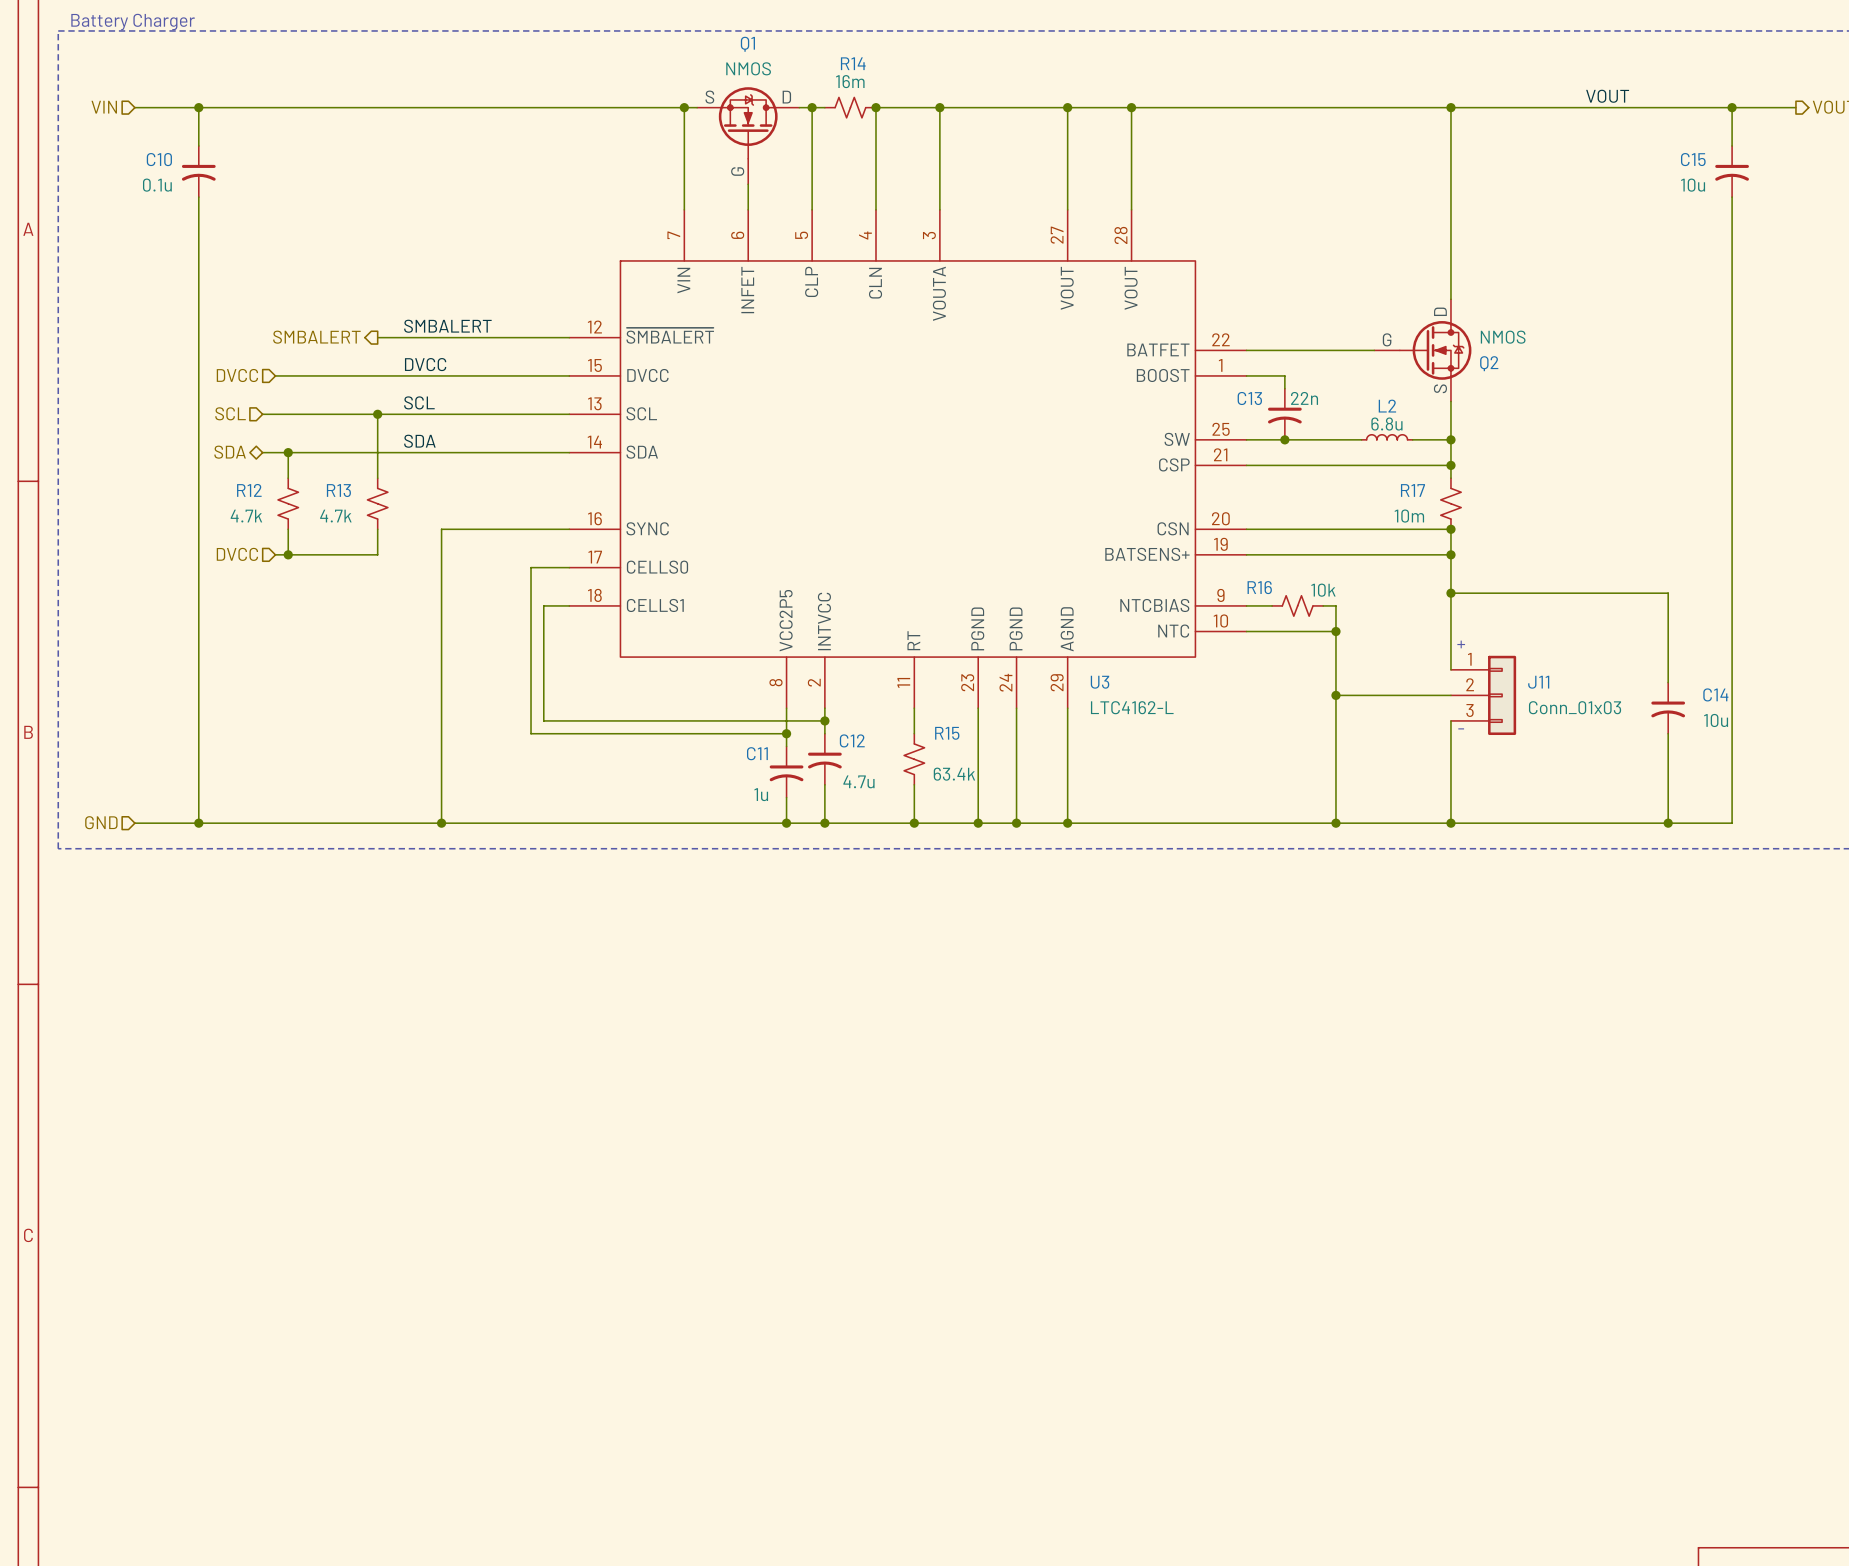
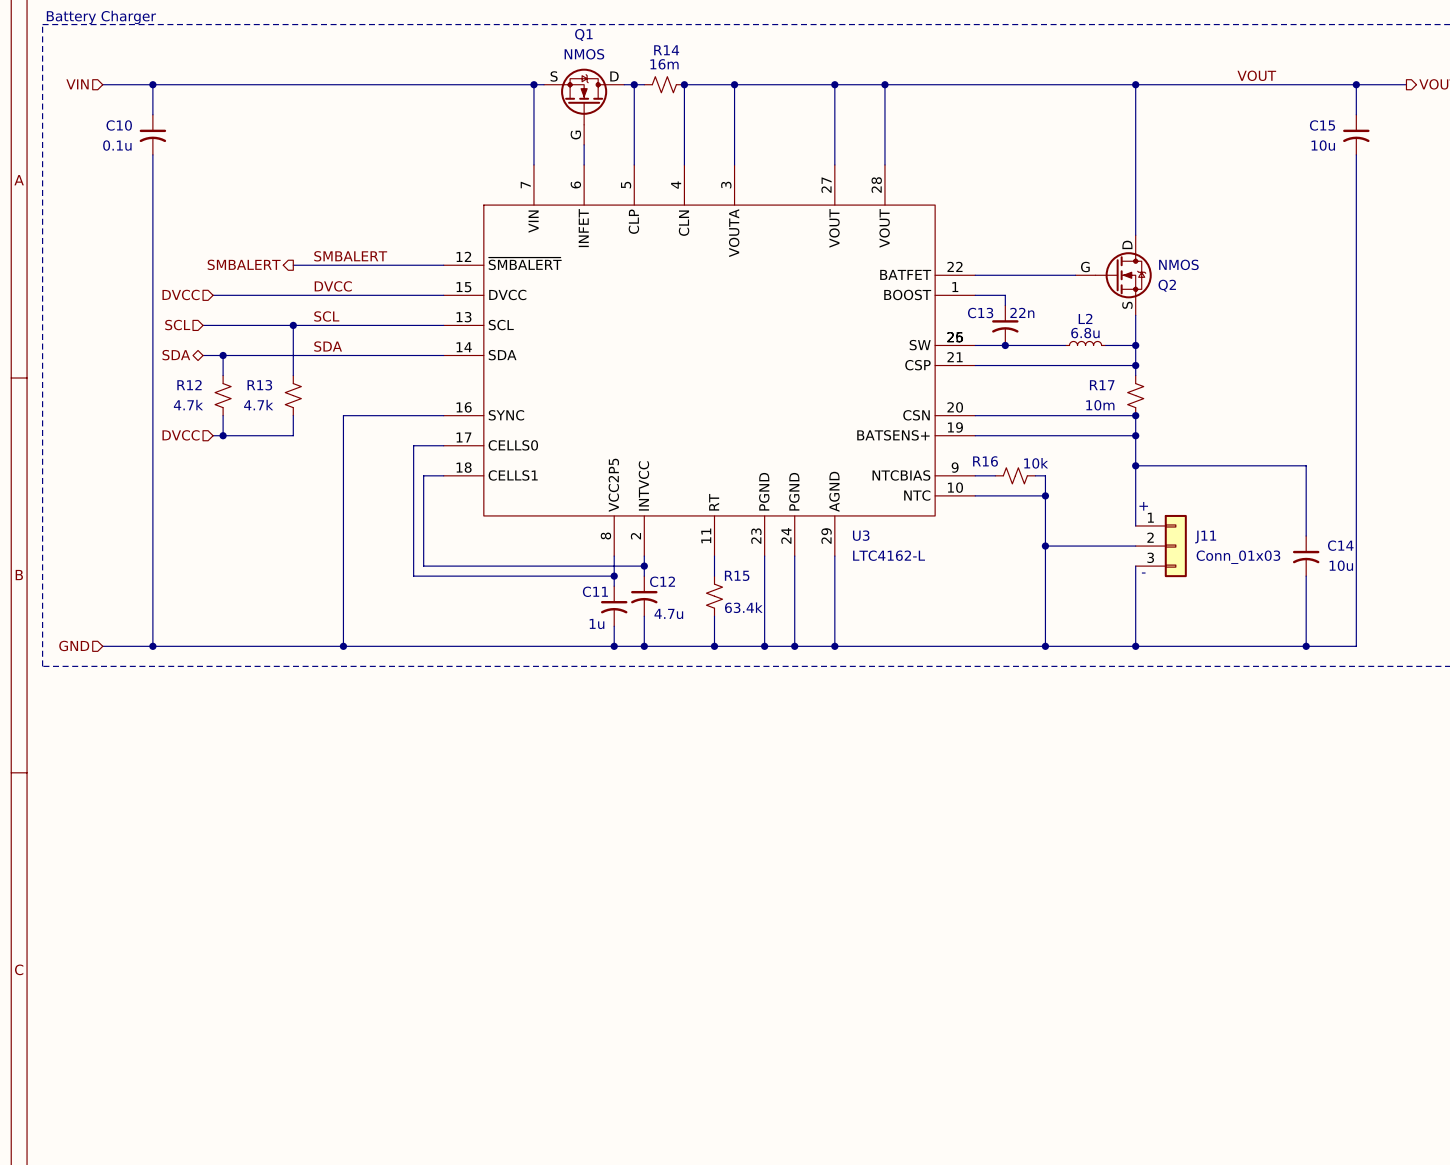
U3 symbol: [569, 209, 1247, 709] -> [443, 164, 976, 557]

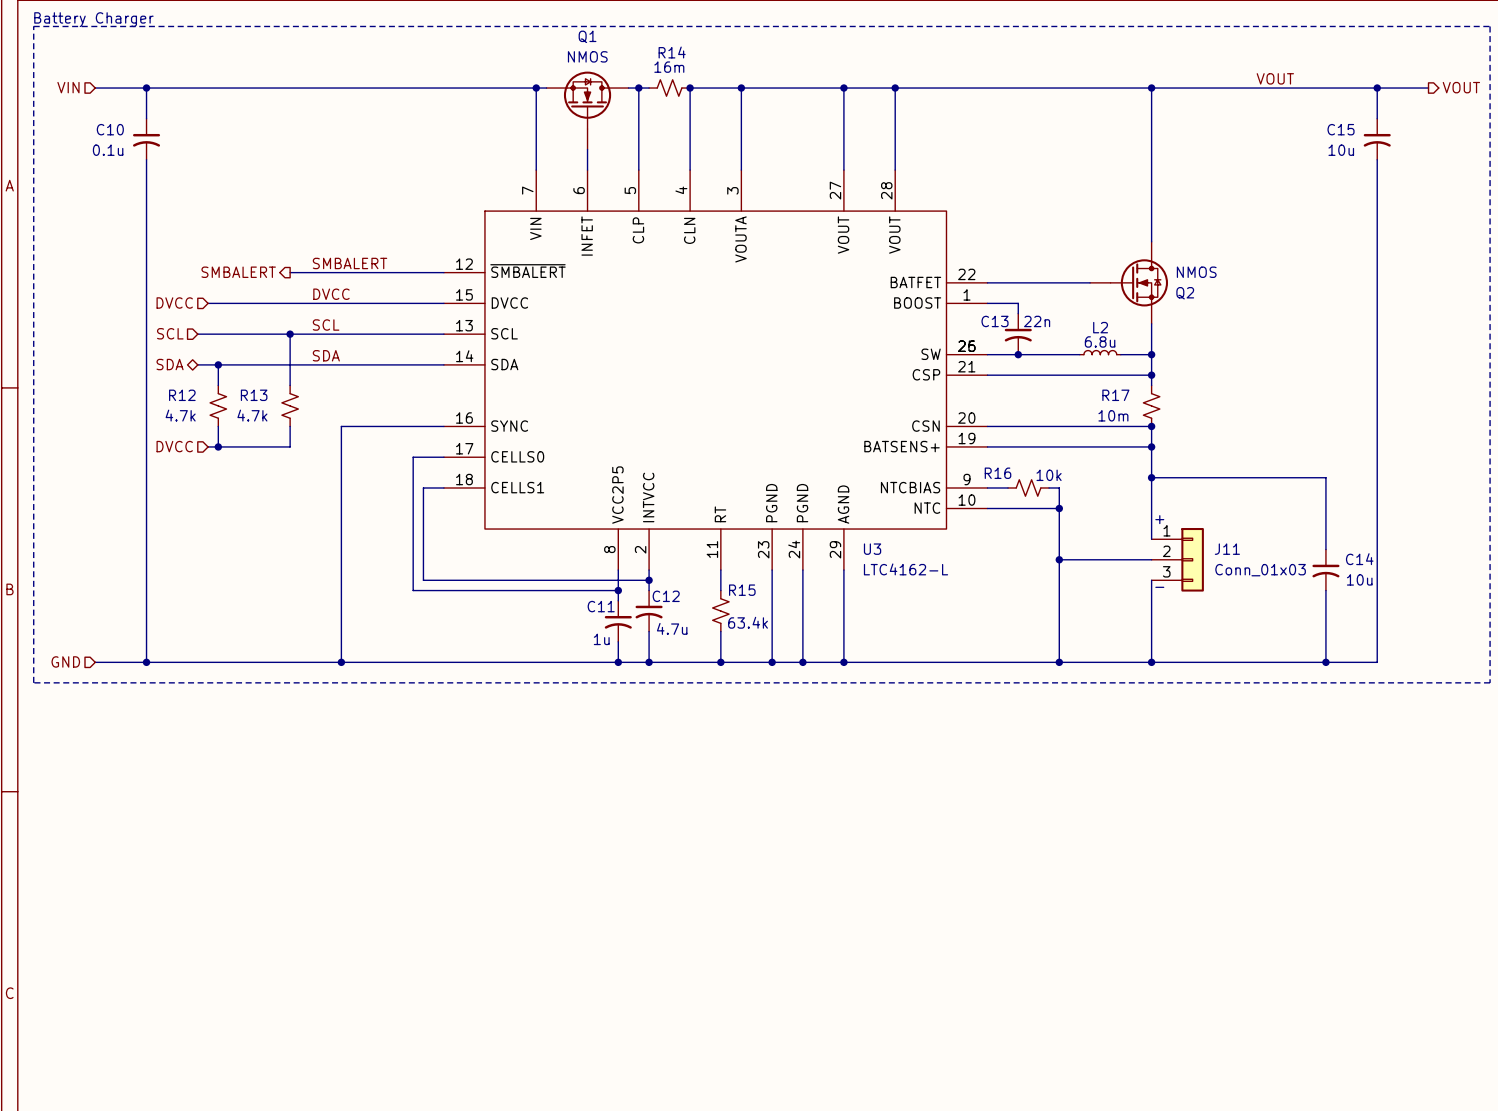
Q1 symbol: [544, 68, 625, 145] -> [546, 71, 629, 150]
Q2 symbol: [1075, 235, 1152, 316] -> [1090, 241, 1169, 324]

